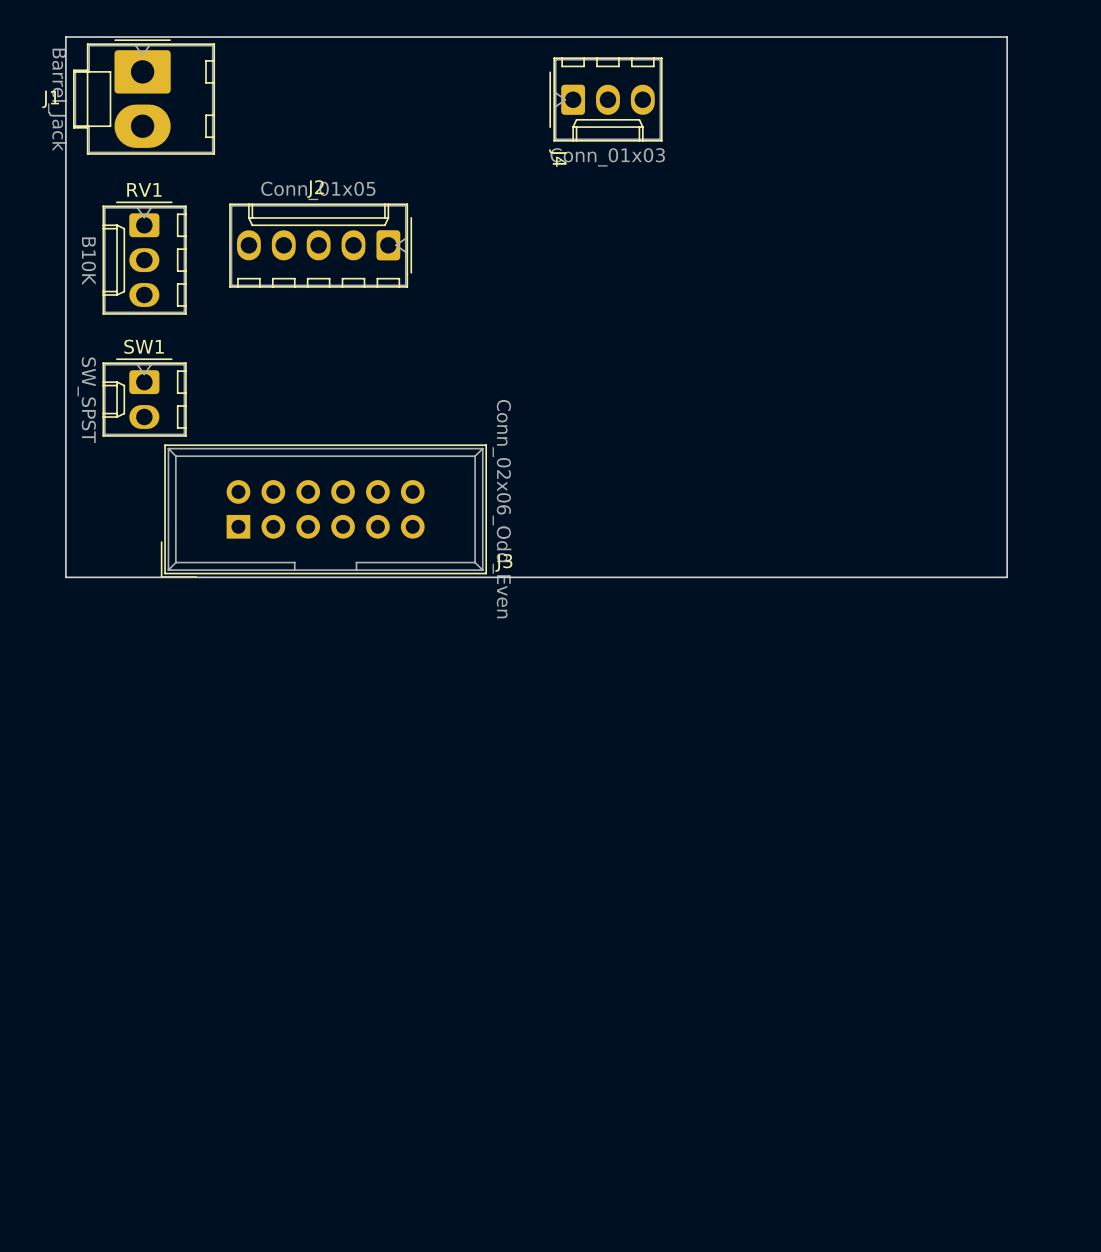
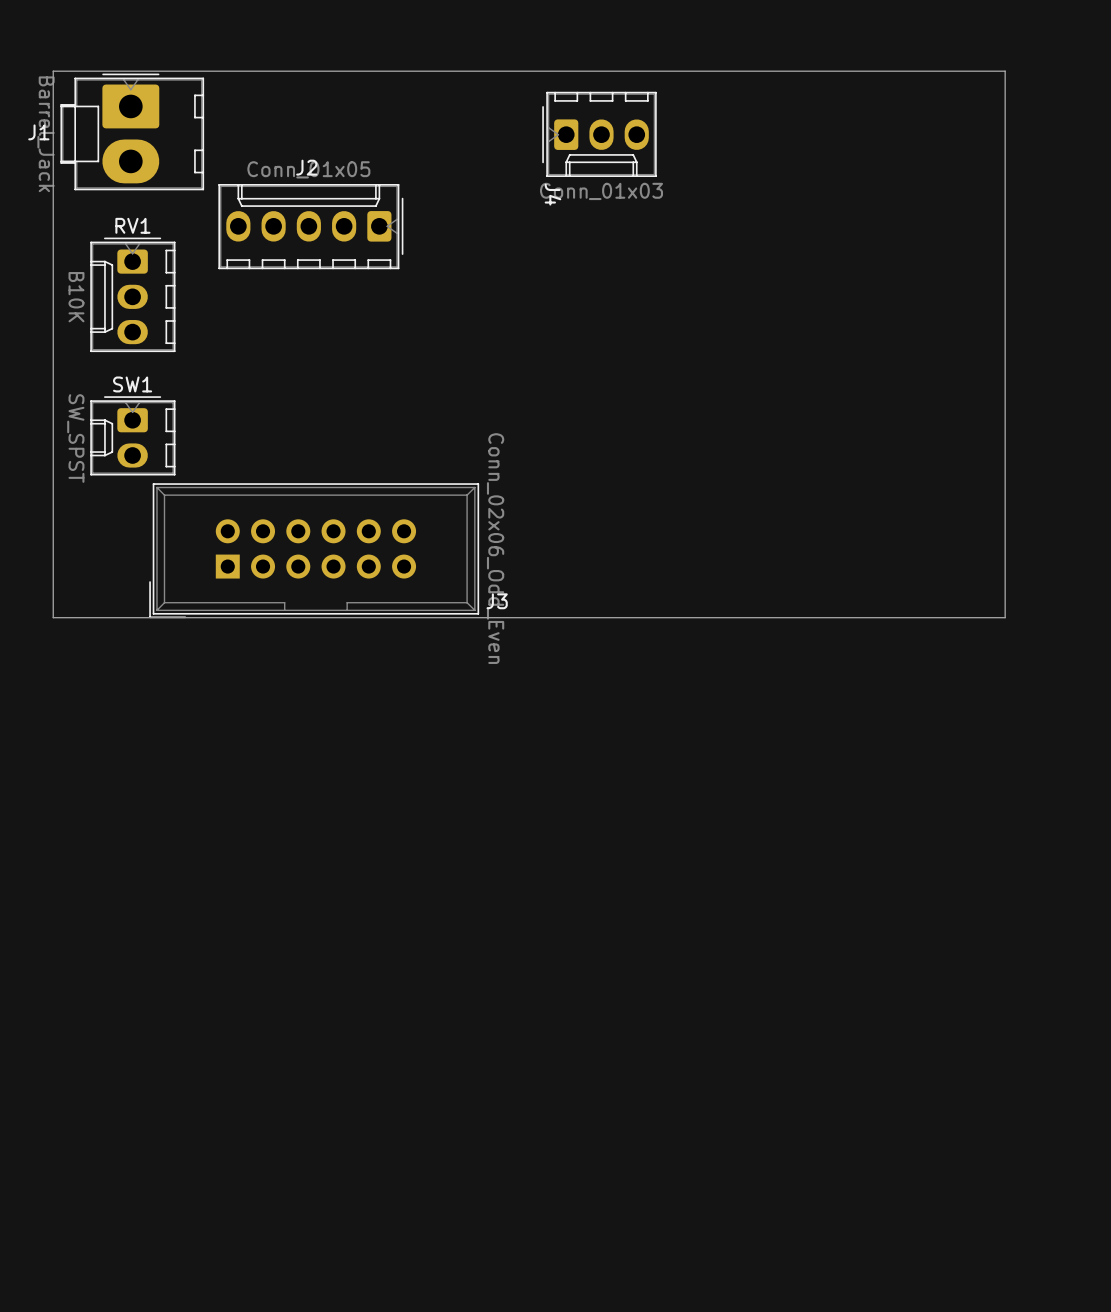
J2 position: (320, 245) -> (310, 226)

